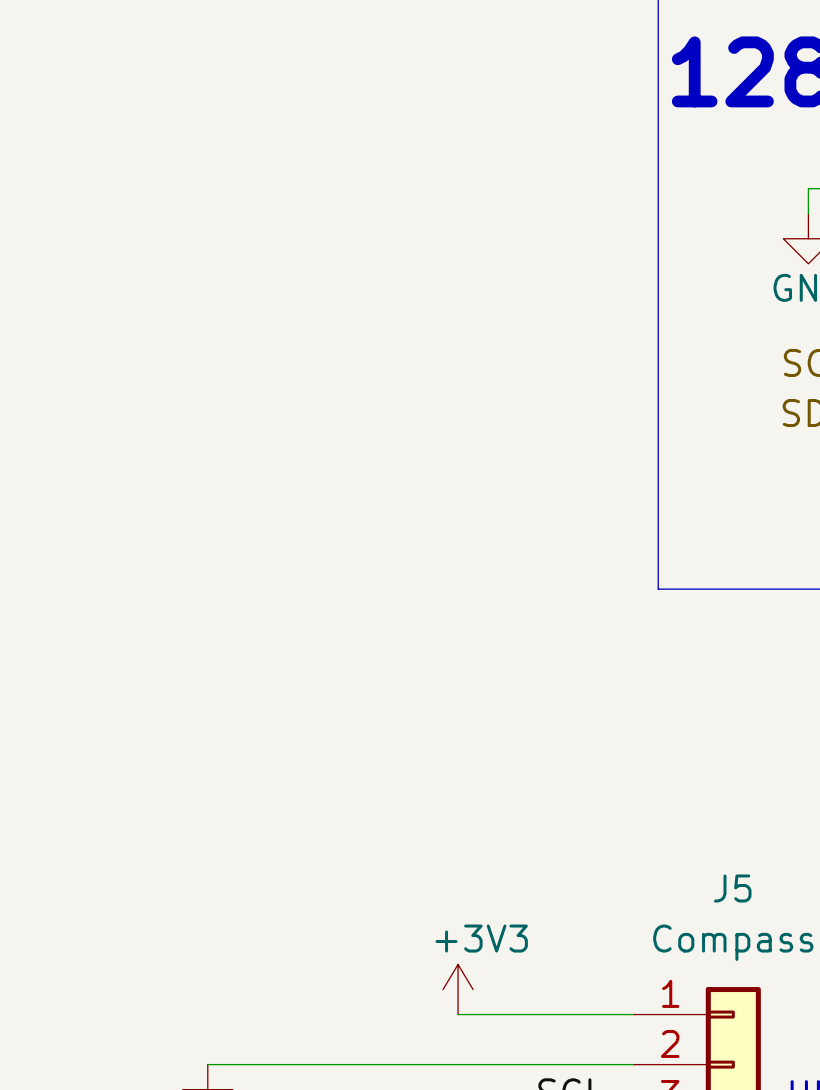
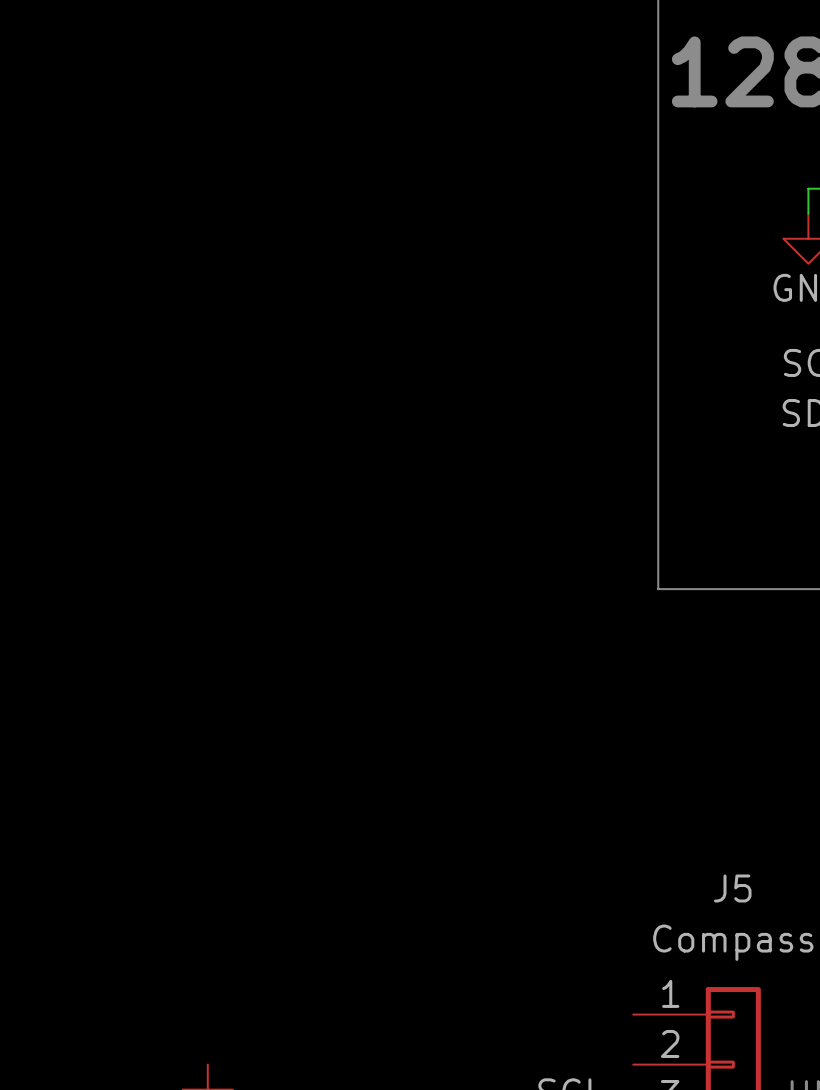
power symbol: +3V3 (458, 989) -> none
wire: (458, 1014) (633, 1014) -> none
wire: (207, 1064) (633, 1064) -> none

